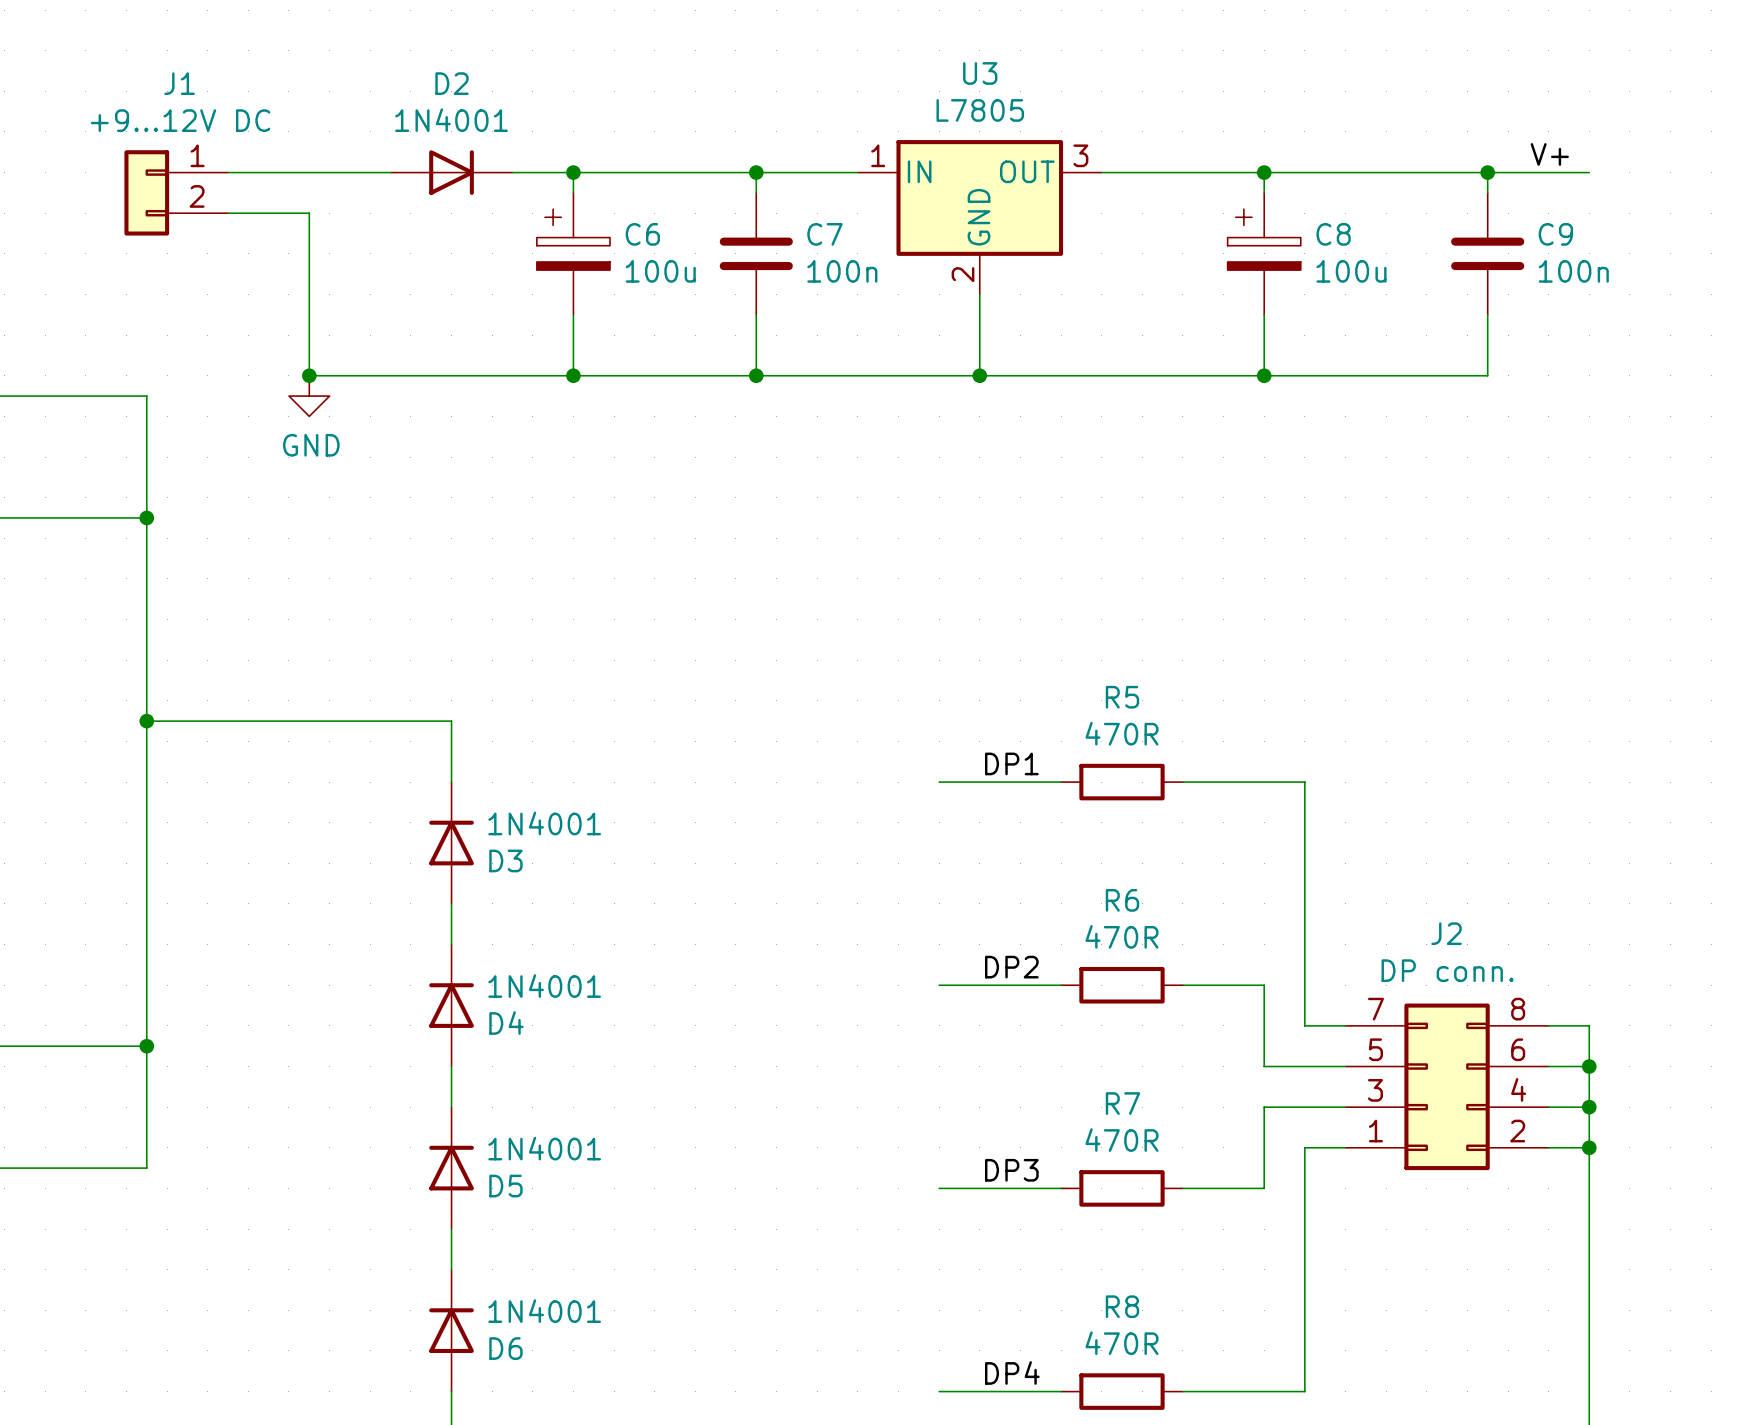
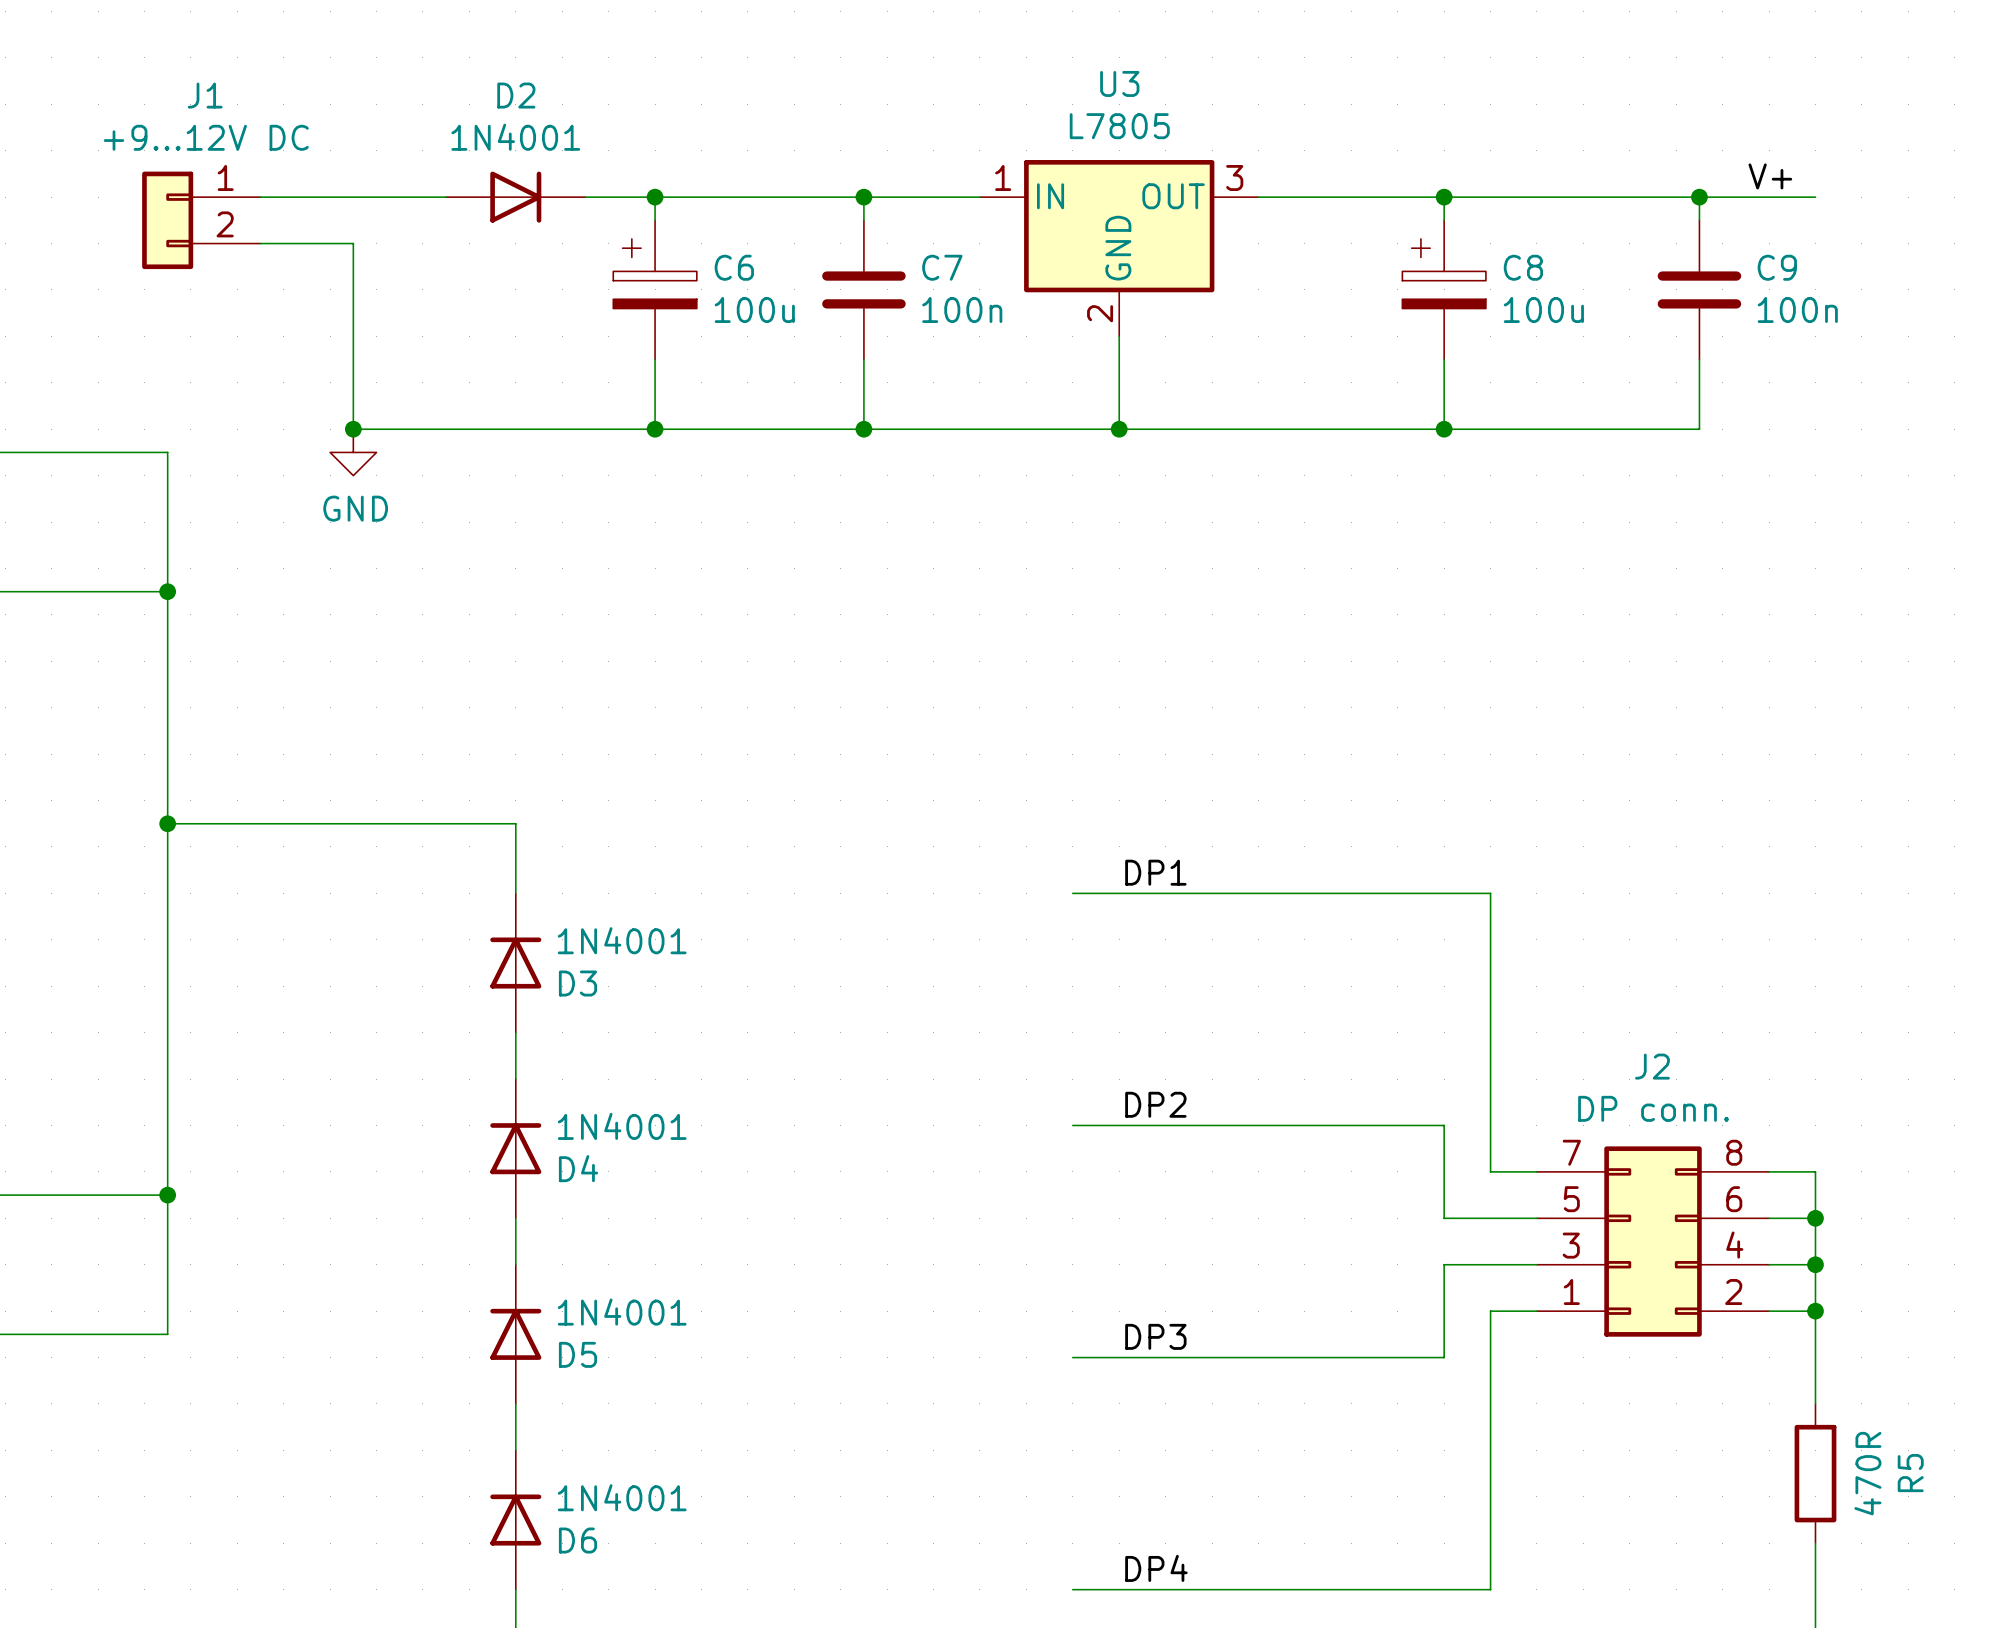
wire: none -> (1212, 893) (1351, 893)
R5 rotation: 0° (1121, 782) -> 90° clockwise (1815, 1473)
R5 position: (1121, 782) -> (1815, 1473)
wire: none -> (1212, 1125) (1351, 1125)
R6: 470R (1121, 985) -> none
wire: none -> (1212, 1357) (1351, 1357)
R7: 470R (1121, 1188) -> none
wire: (1589, 1229) (1589, 1350) -> none
wire: none -> (1212, 1589) (1351, 1589)
R8: 470R (1121, 1391) -> none

